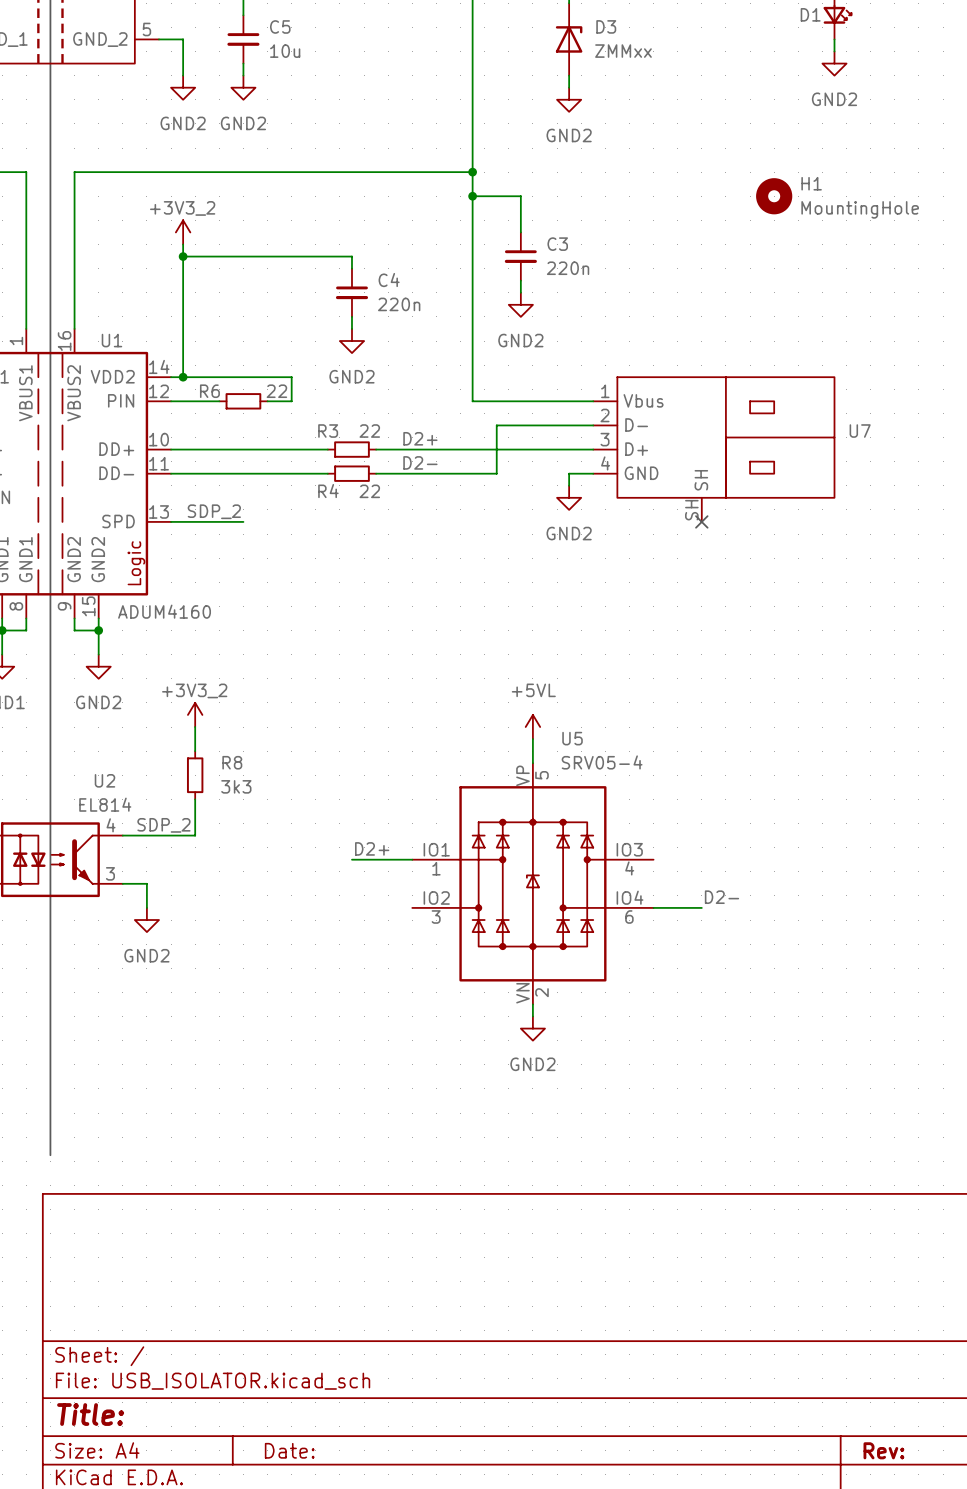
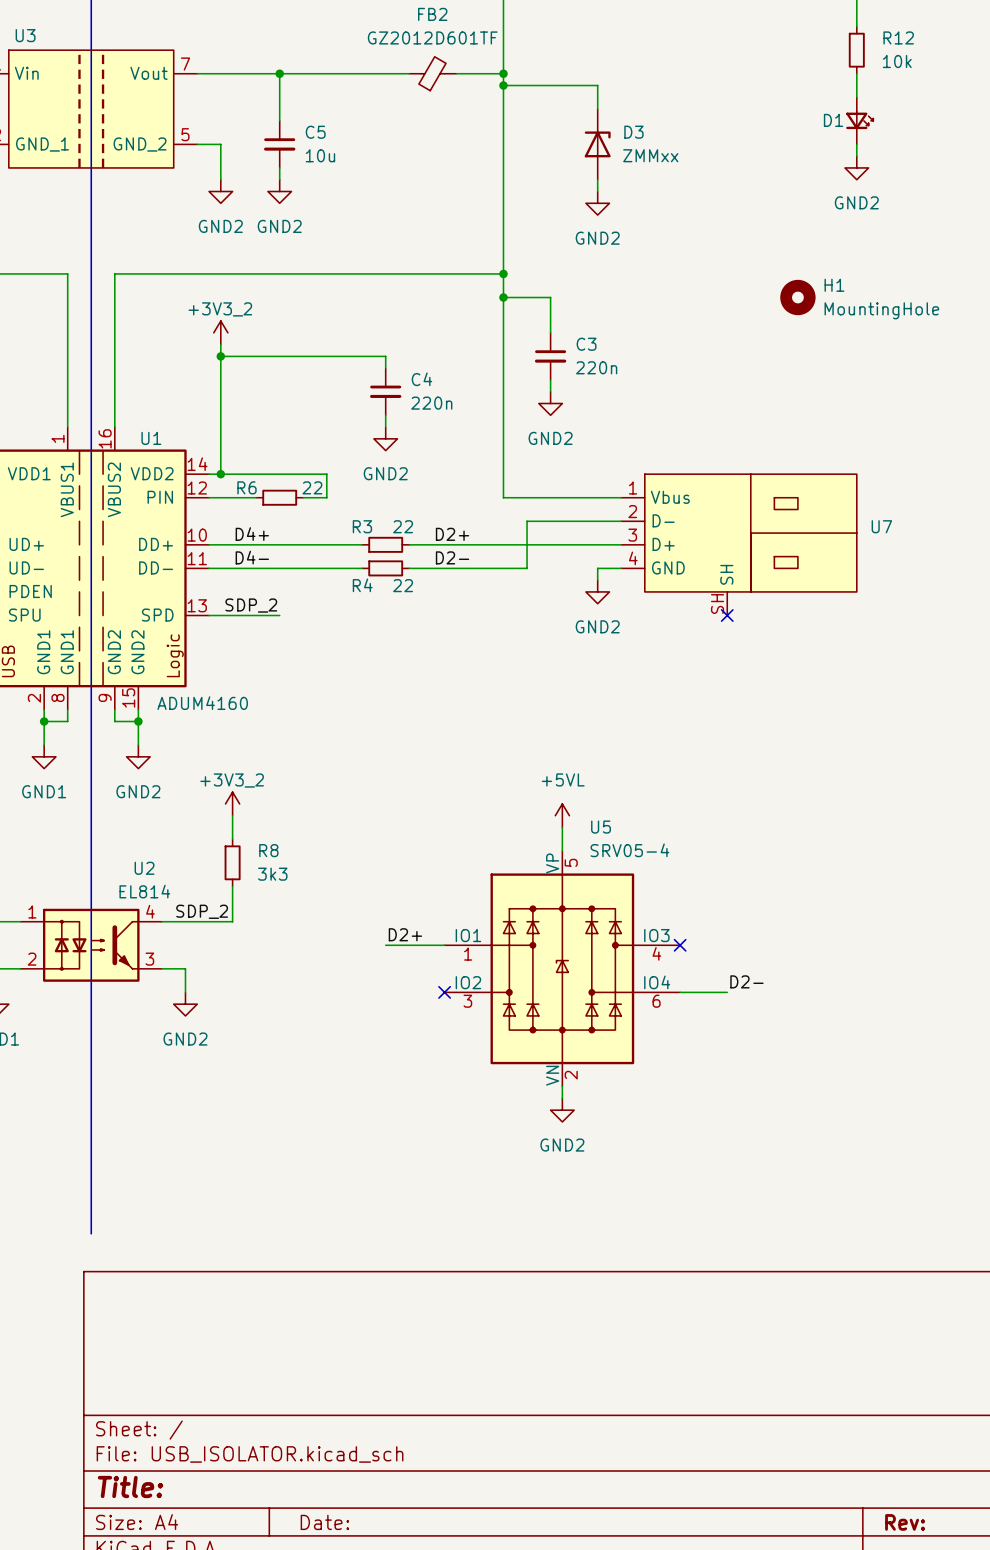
label: none -> D4+ (252, 534)
label: none -> D4- (252, 557)
no-connect mark: none -> (680, 945)
no-connect mark: none -> (444, 992)

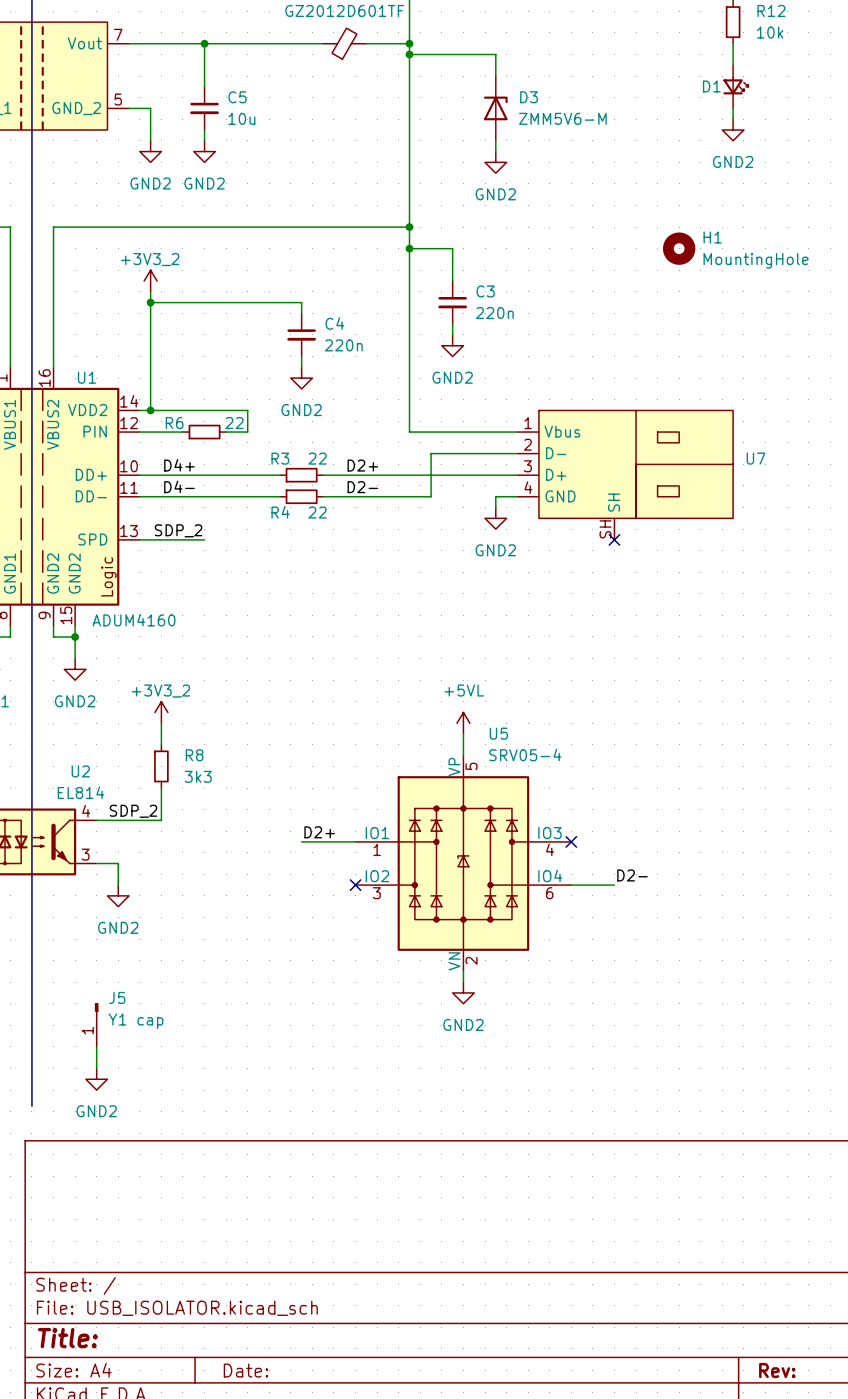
D3 value: ZMMxx (650, 155) -> ZMM5V6-M (562, 118)
J5: none -> Y1 cap (96, 1024)
wire: none -> (96, 1046) (96, 1068)
power symbol: none -> GND2 (96, 1079)

